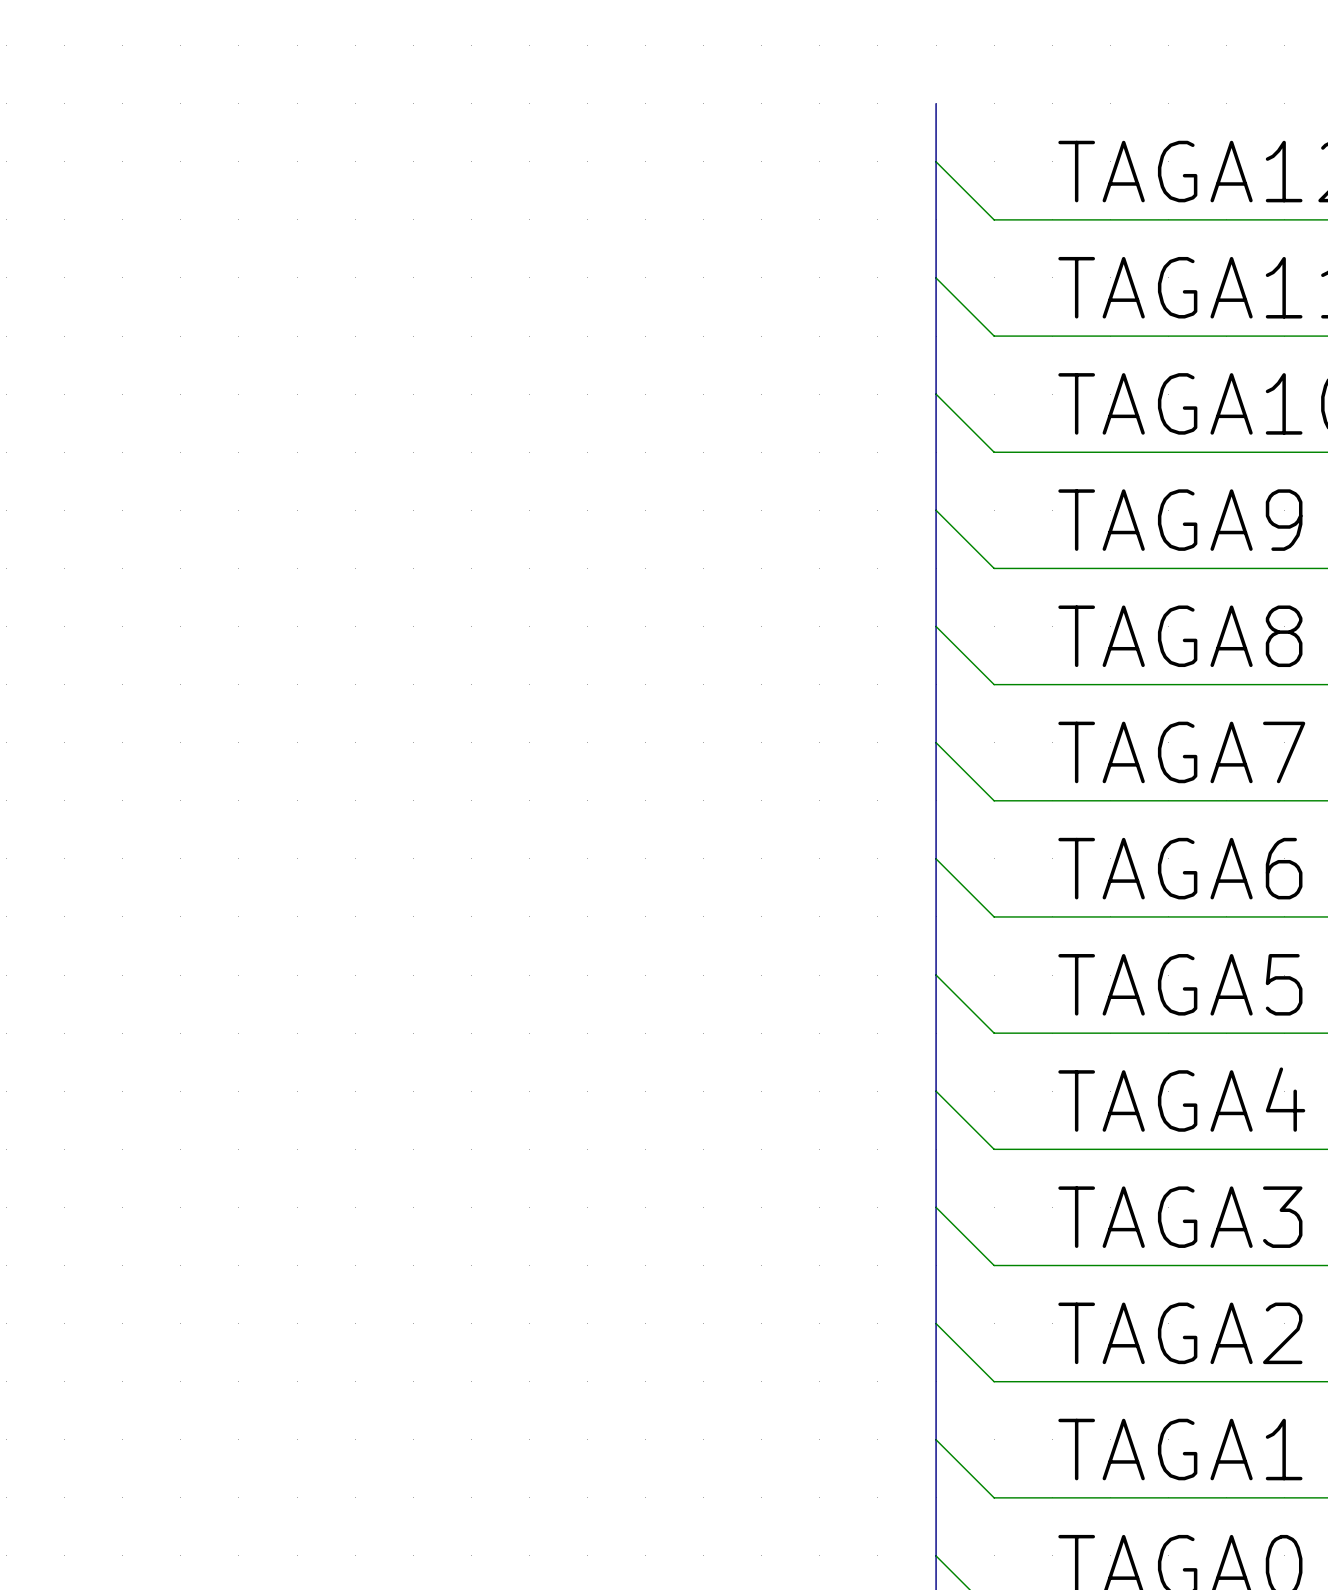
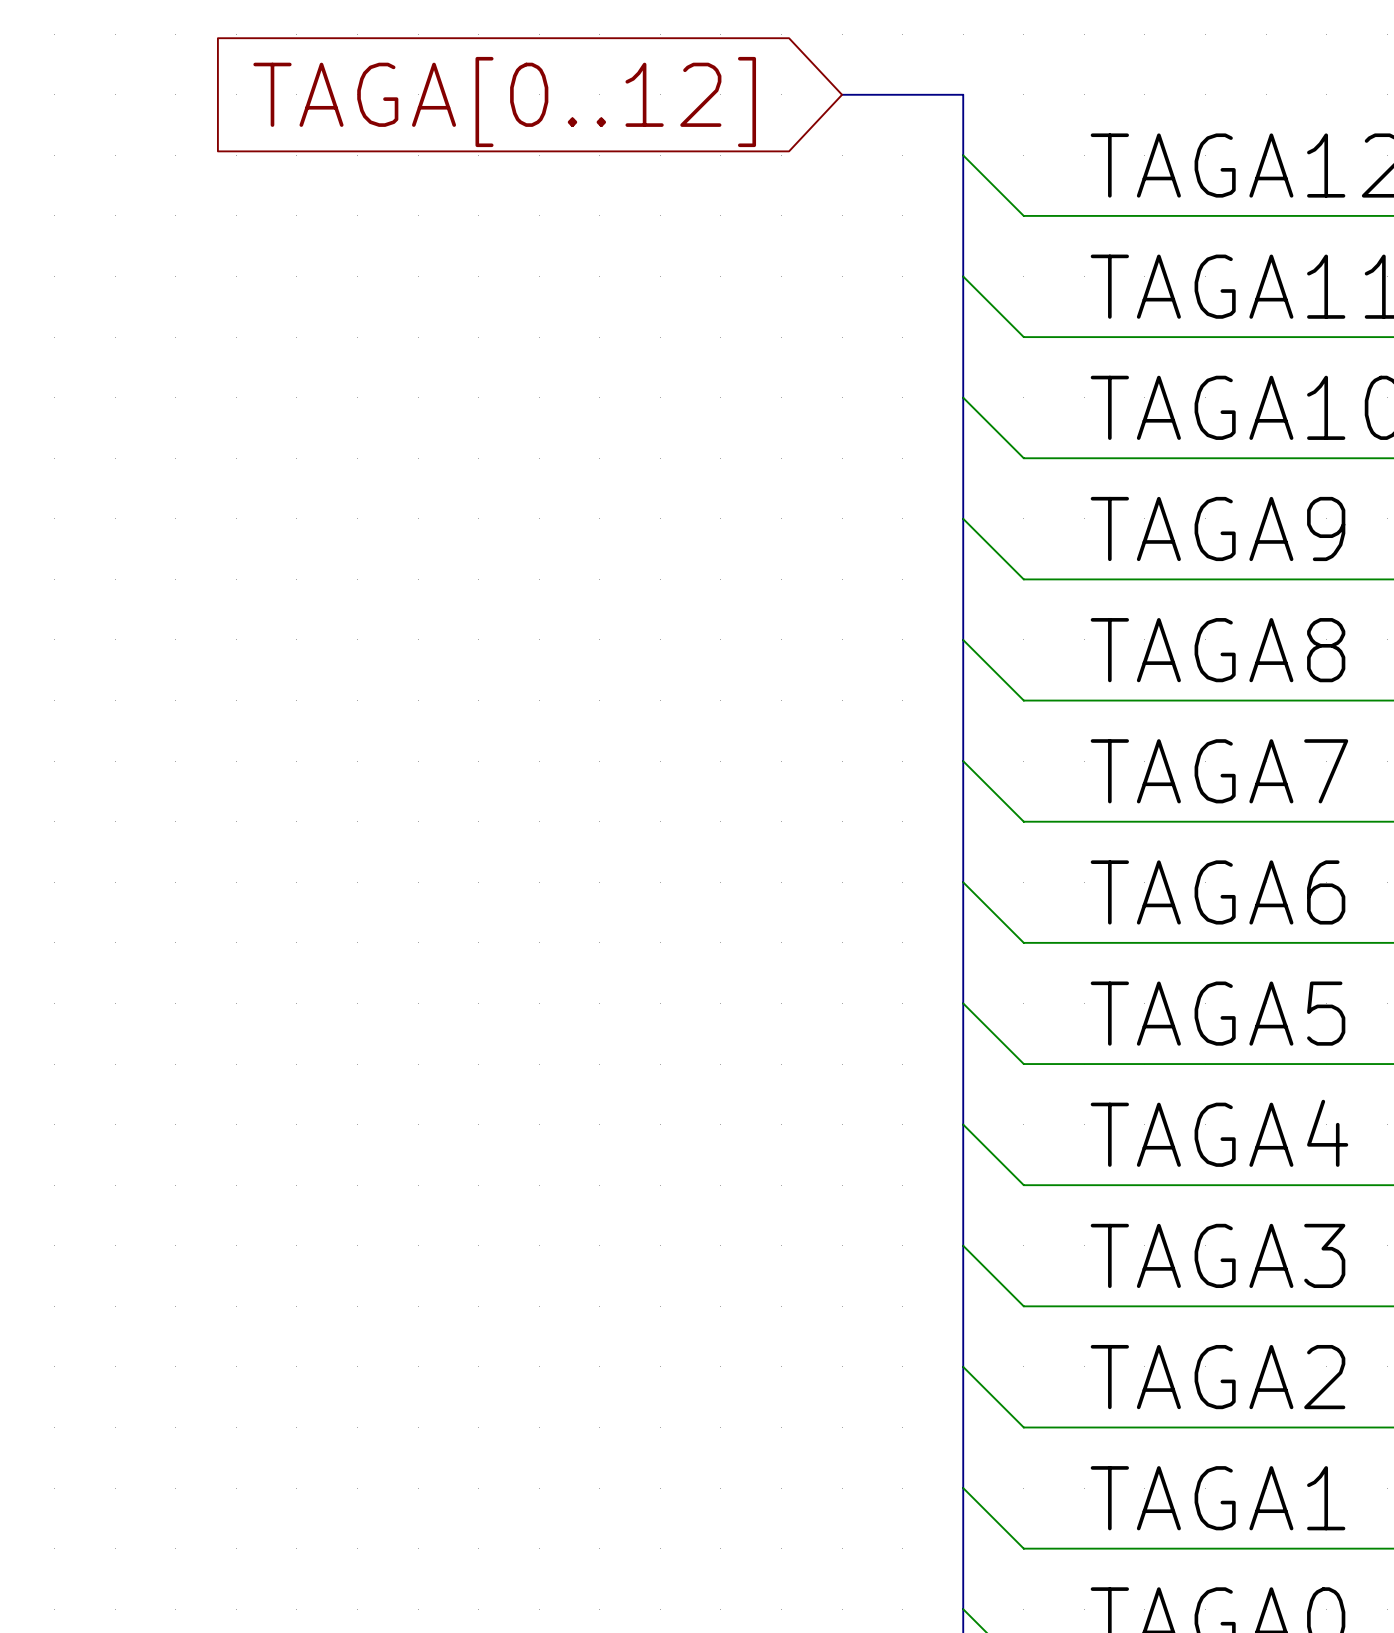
bus: none -> (842, 94) (963, 94)
global label: none -> TAGA[0..12] (504, 102)

